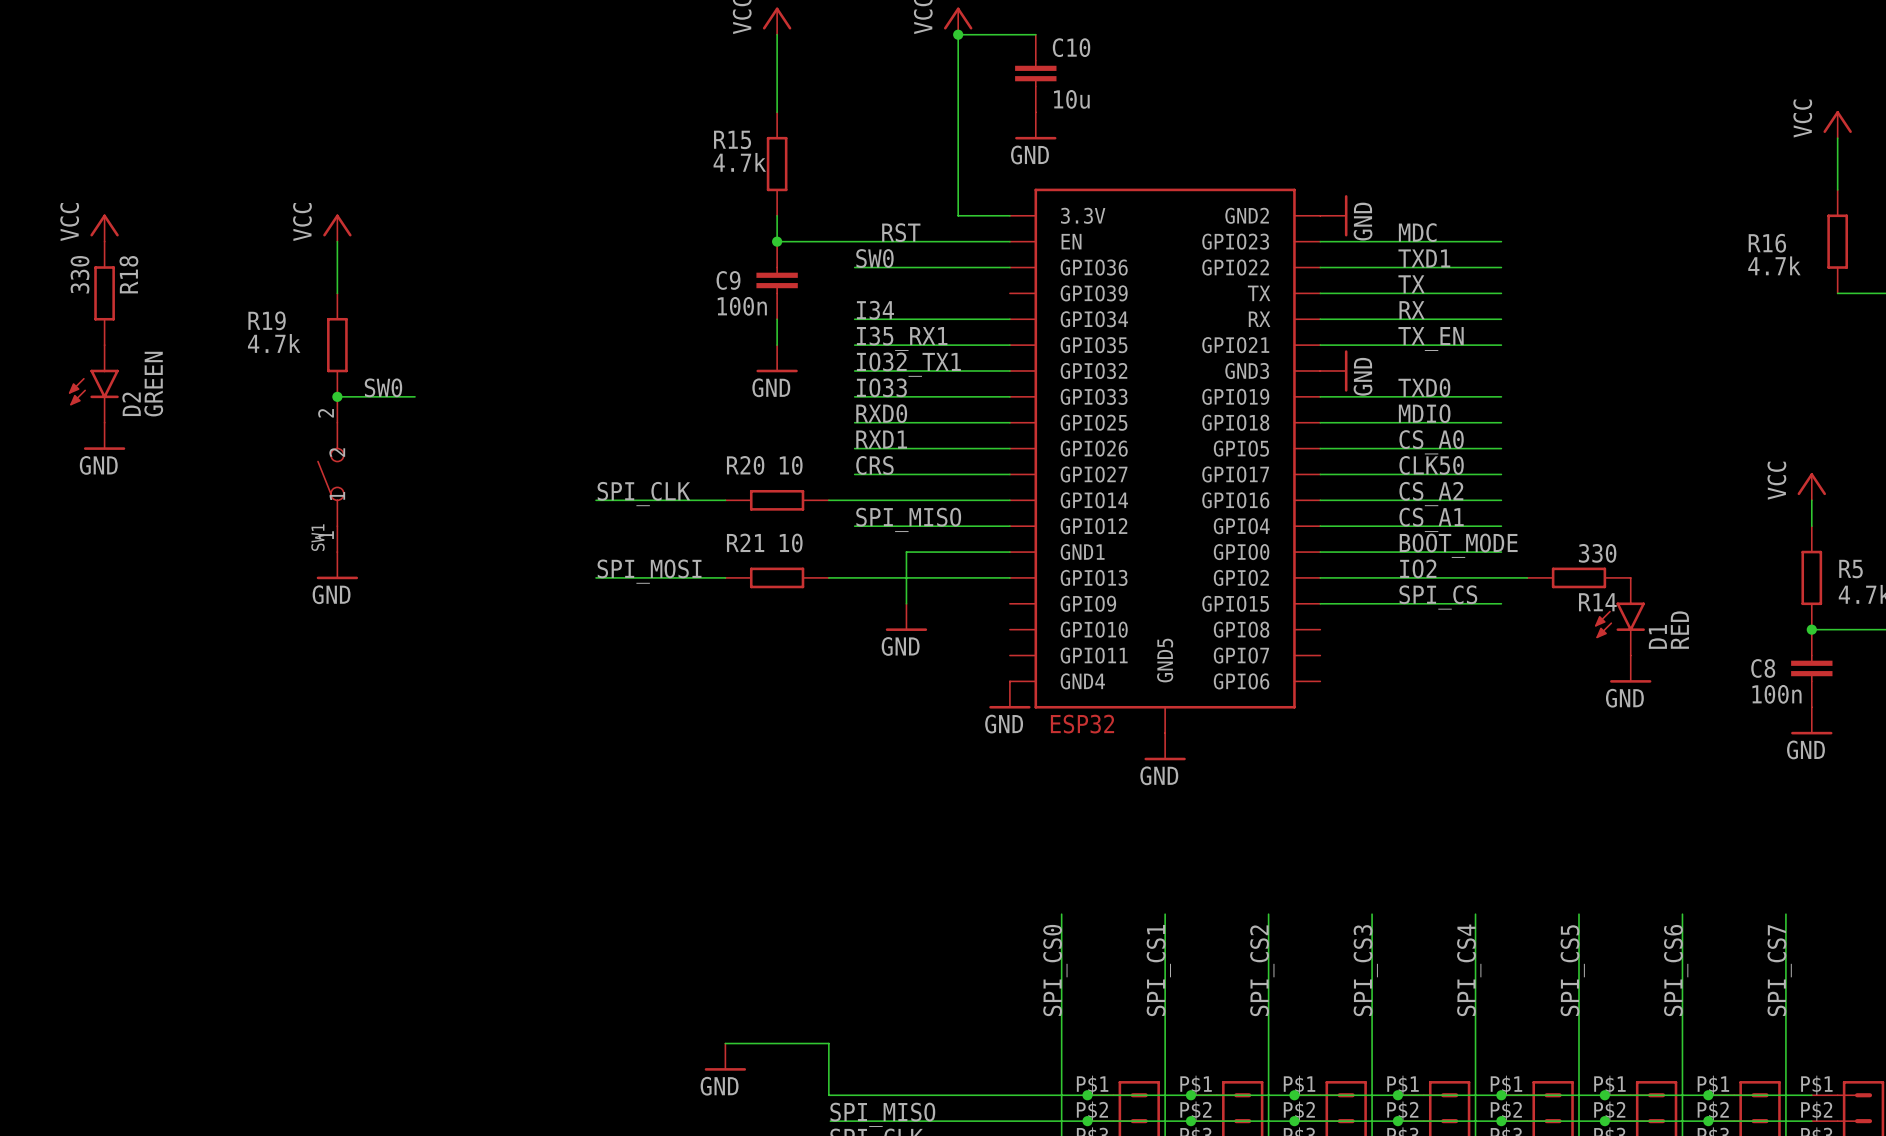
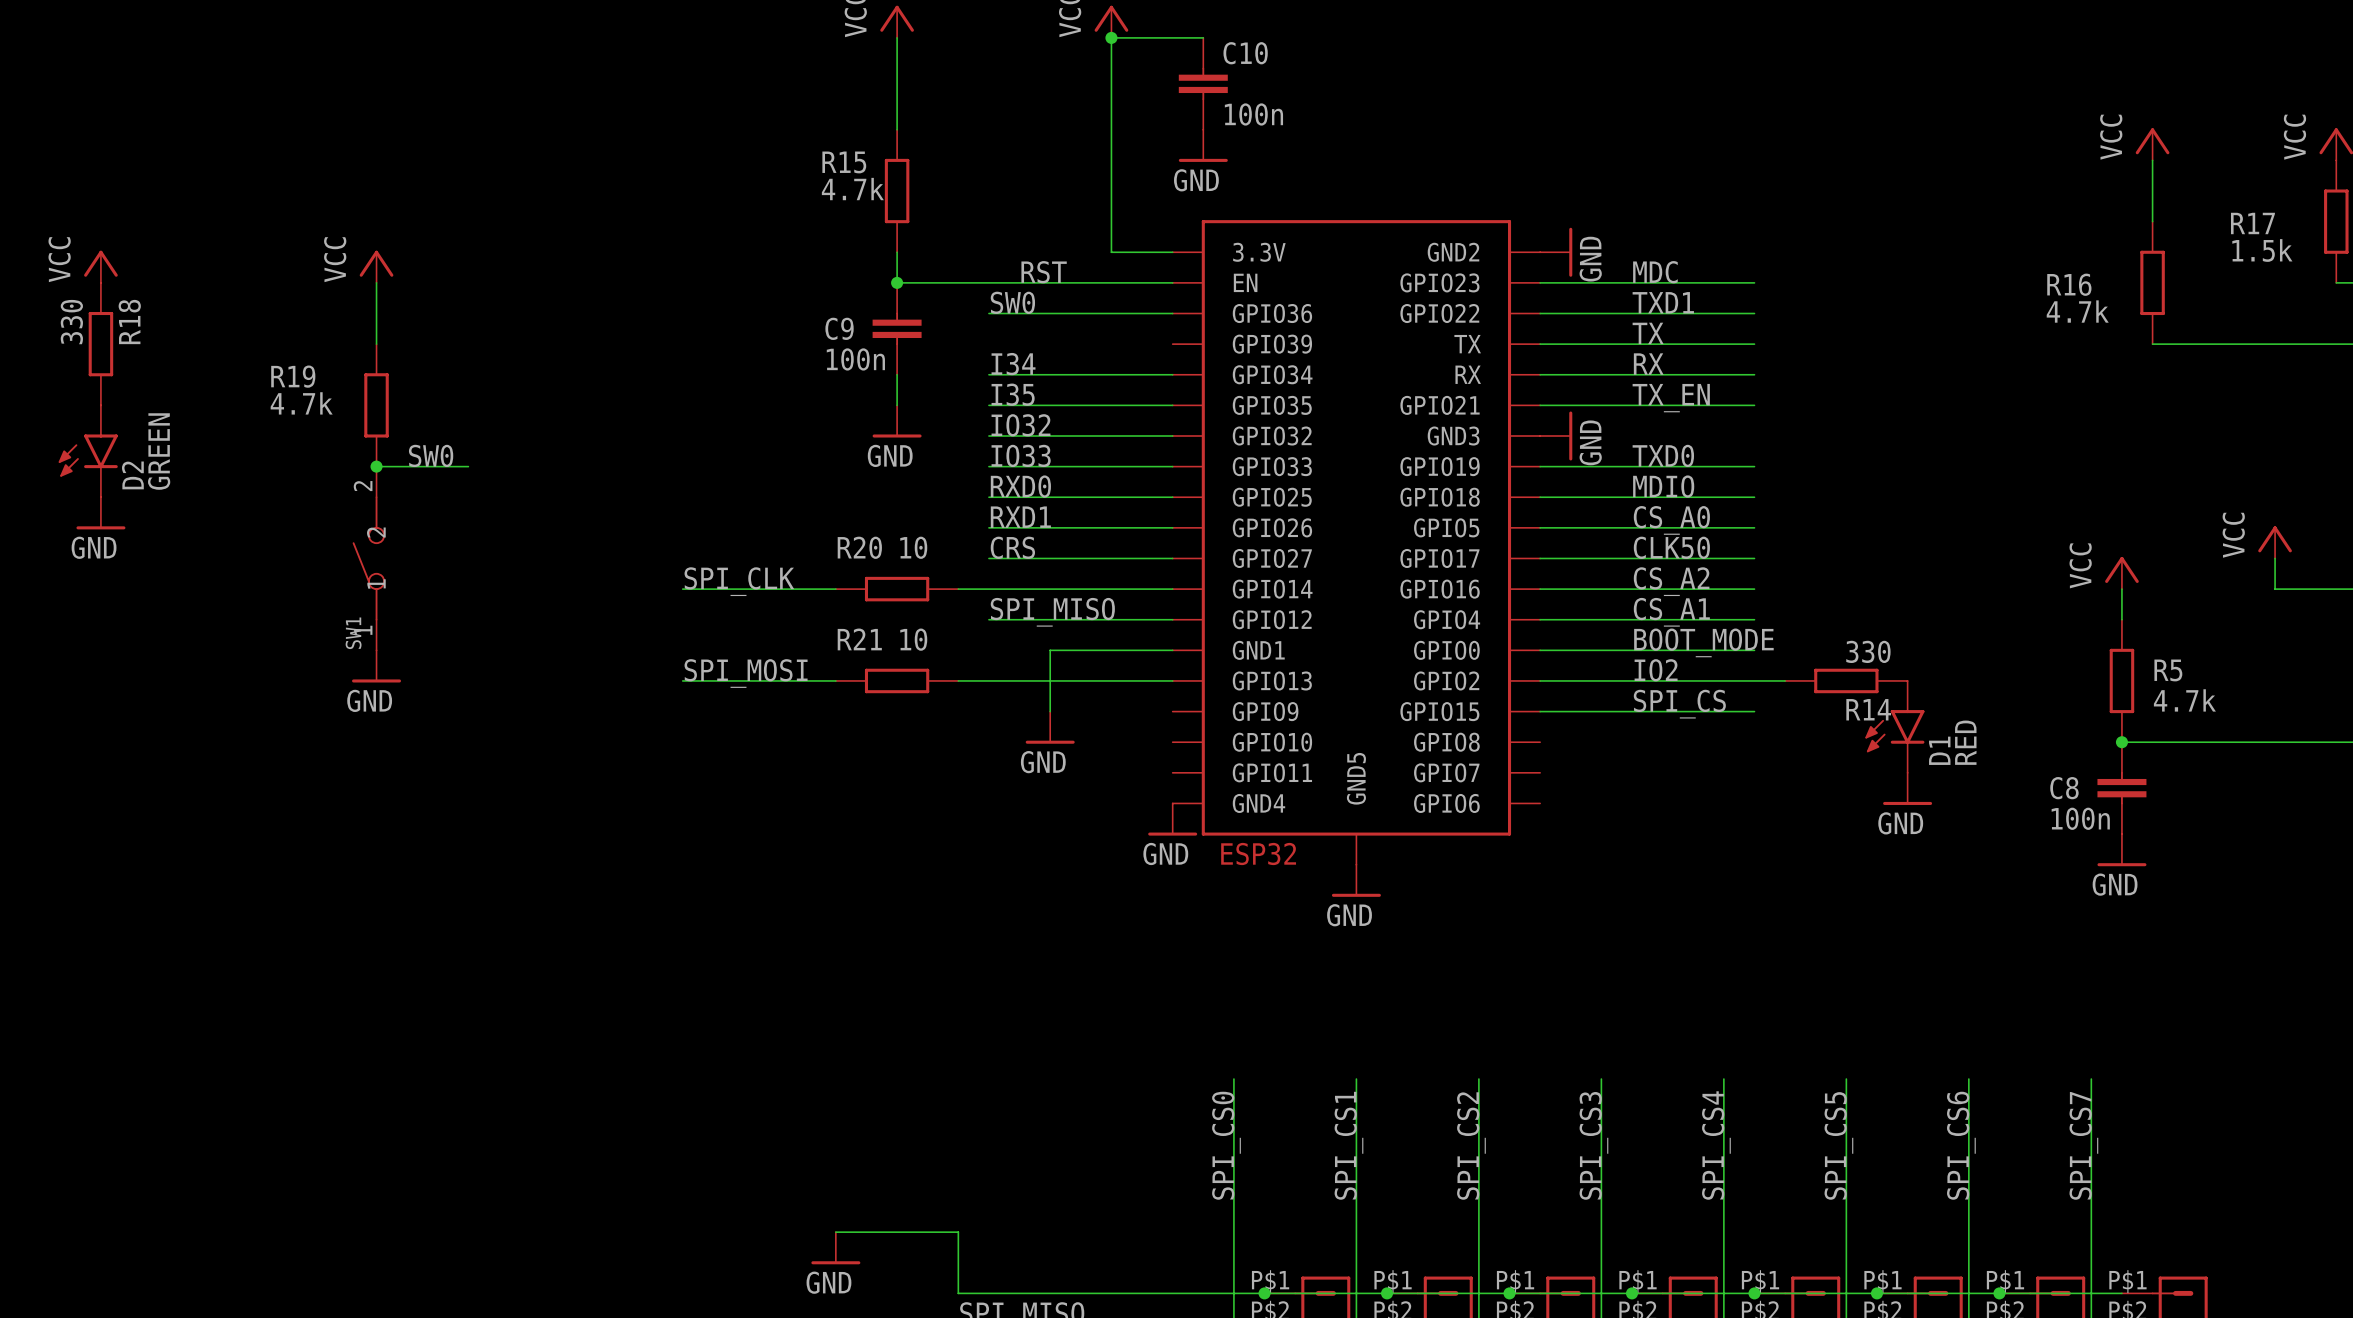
C10 value: 10u (1071, 99) -> 100n (1253, 114)
label: I35_RX1 (902, 338) -> I35 (1013, 394)
label: IO32_TX1 (908, 364) -> IO32 (1020, 425)

